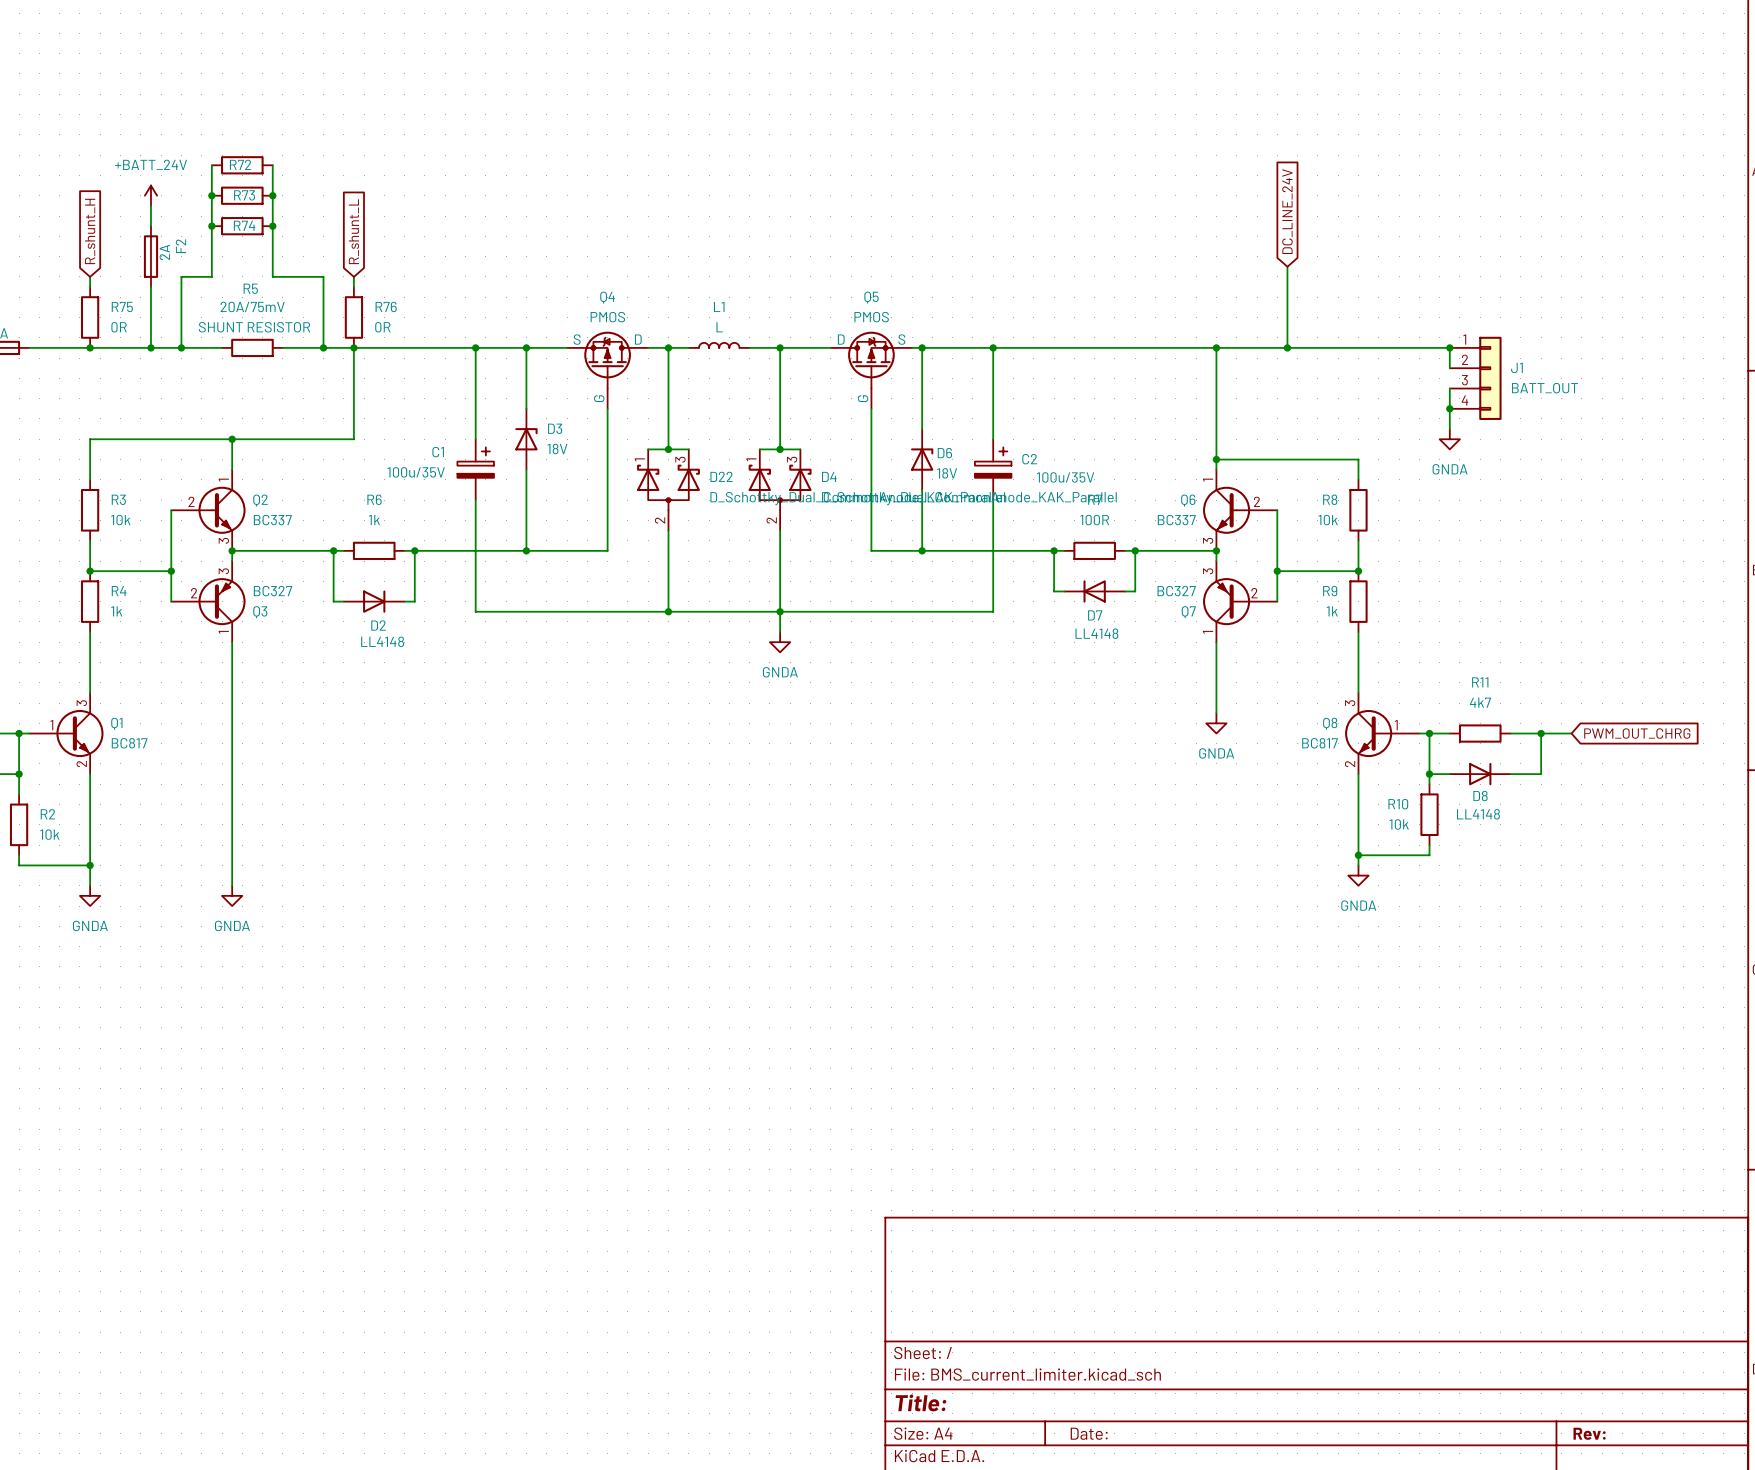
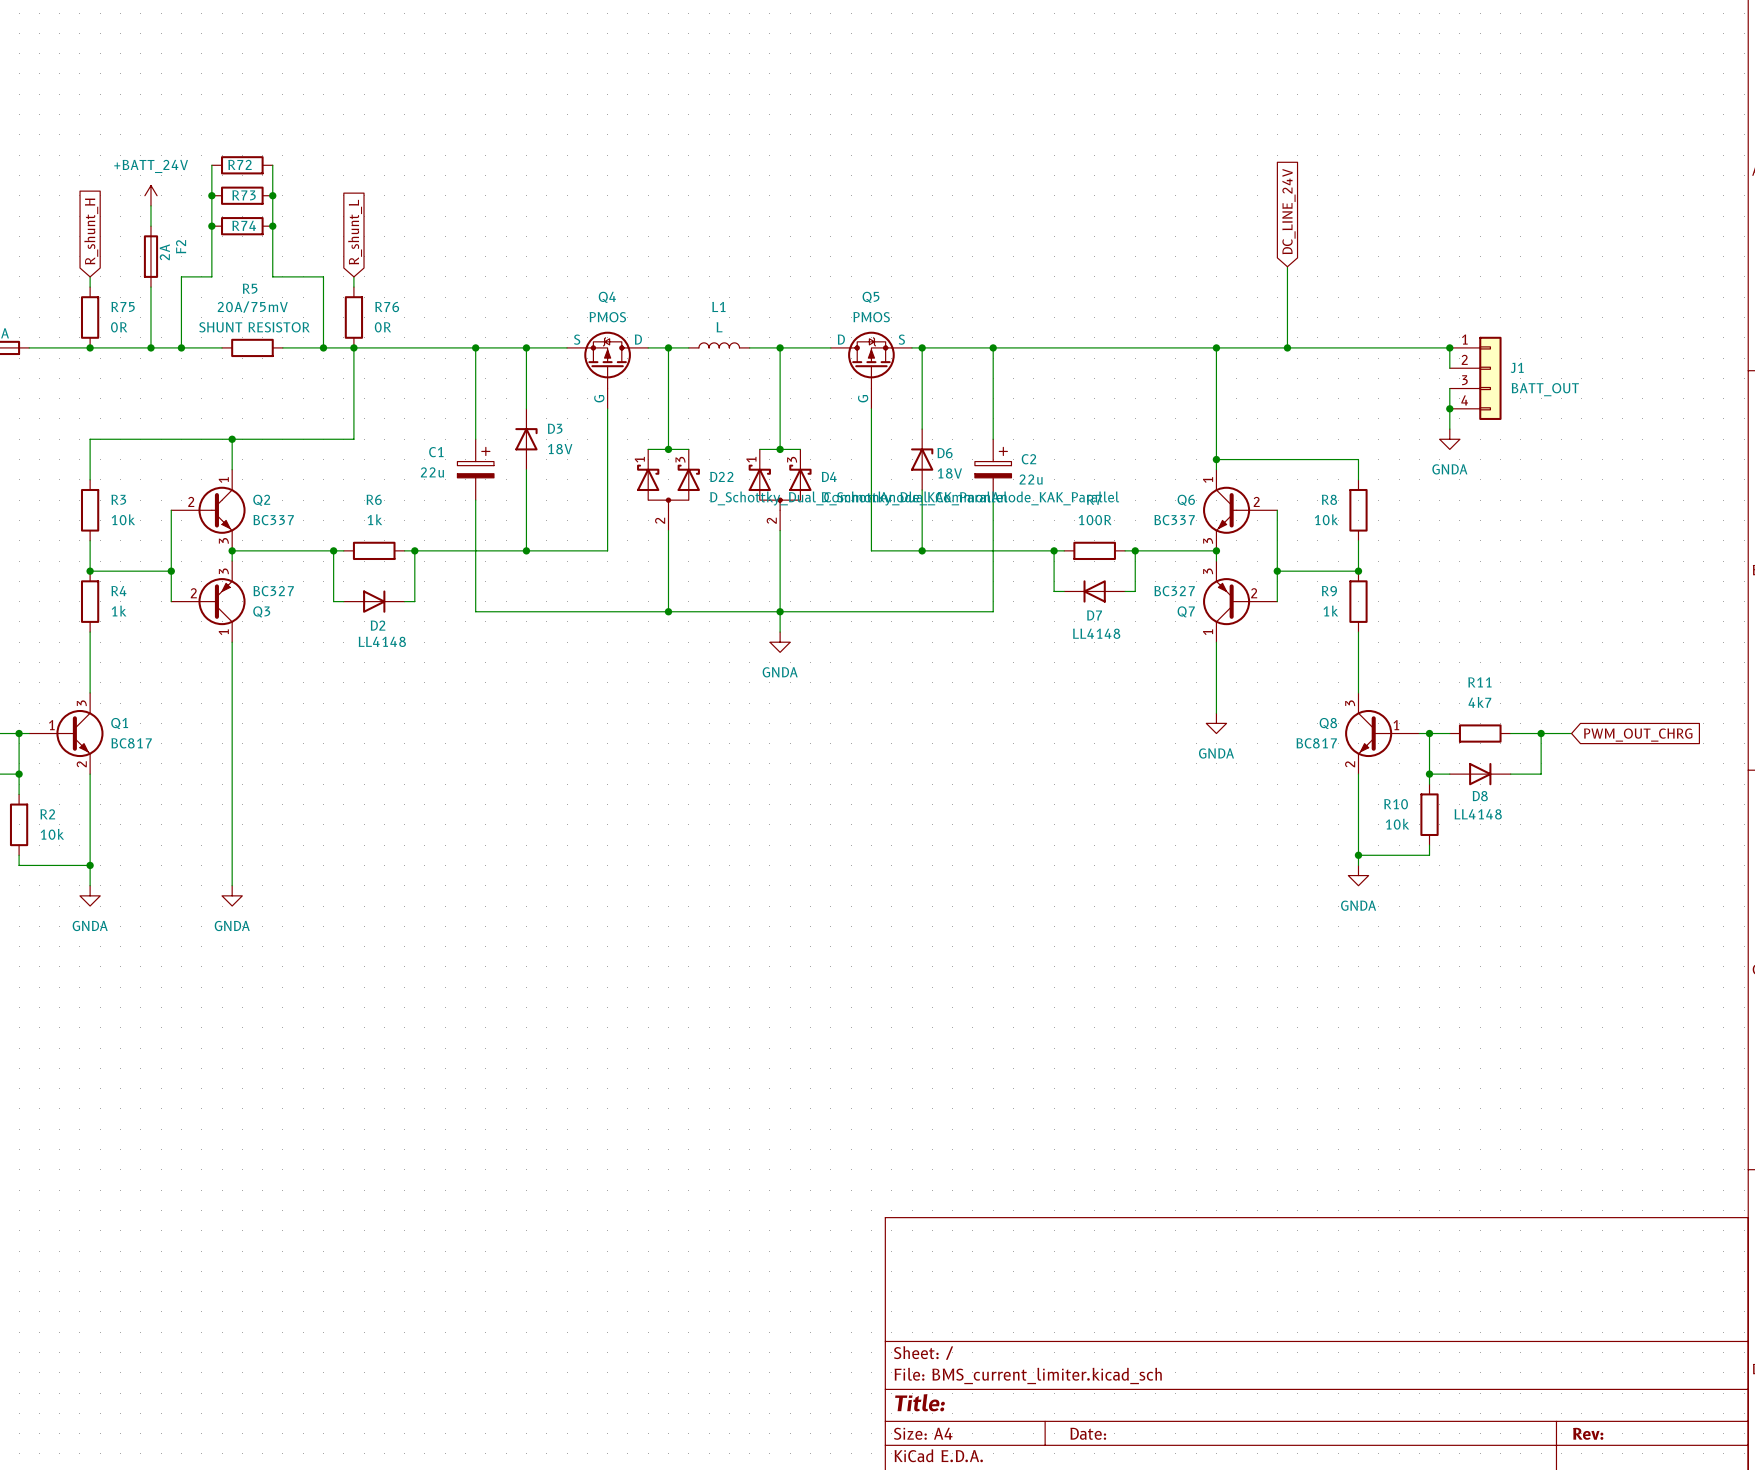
C1 value: 100u/35V (416, 472) -> 22u (432, 472)
C2 value: 100u/35V (1065, 477) -> 22u (1031, 479)

